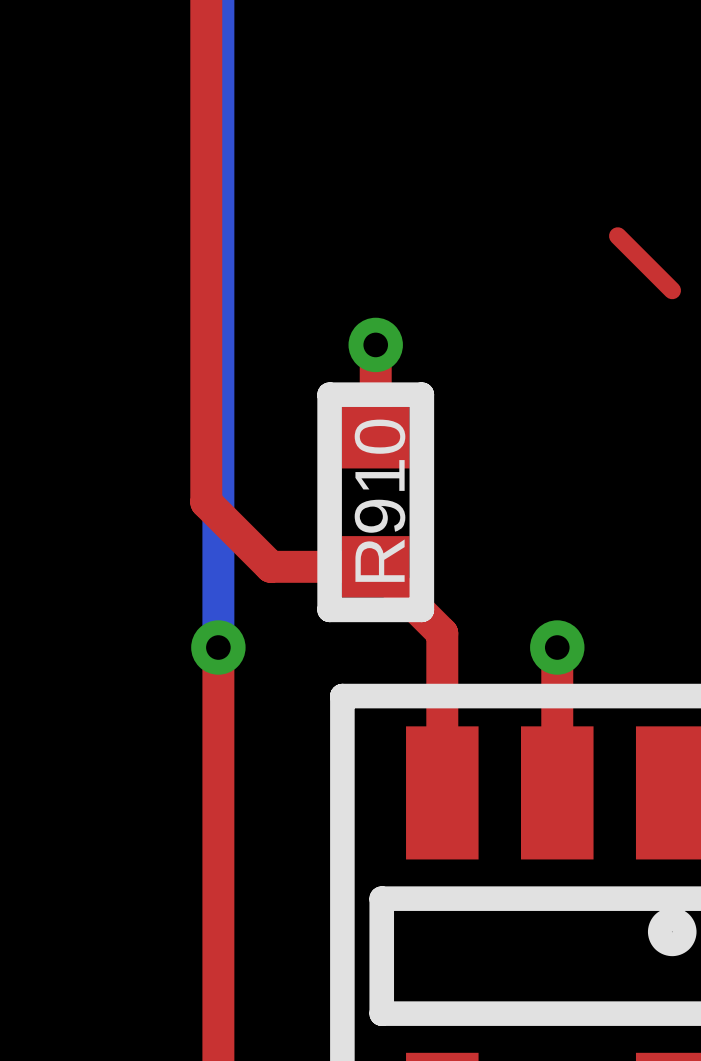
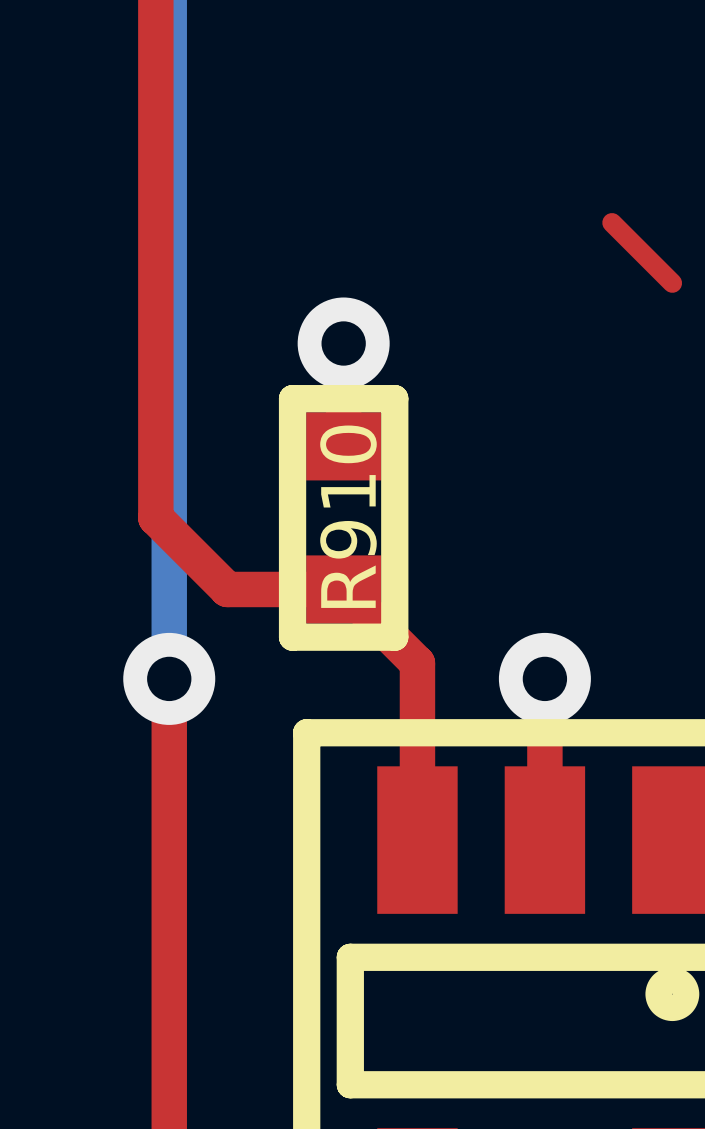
via size: [348, 317, 403, 373] -> [297, 297, 390, 390]
via size: [191, 620, 246, 675] -> [123, 632, 216, 725]
via size: [530, 620, 585, 675] -> [498, 632, 591, 725]

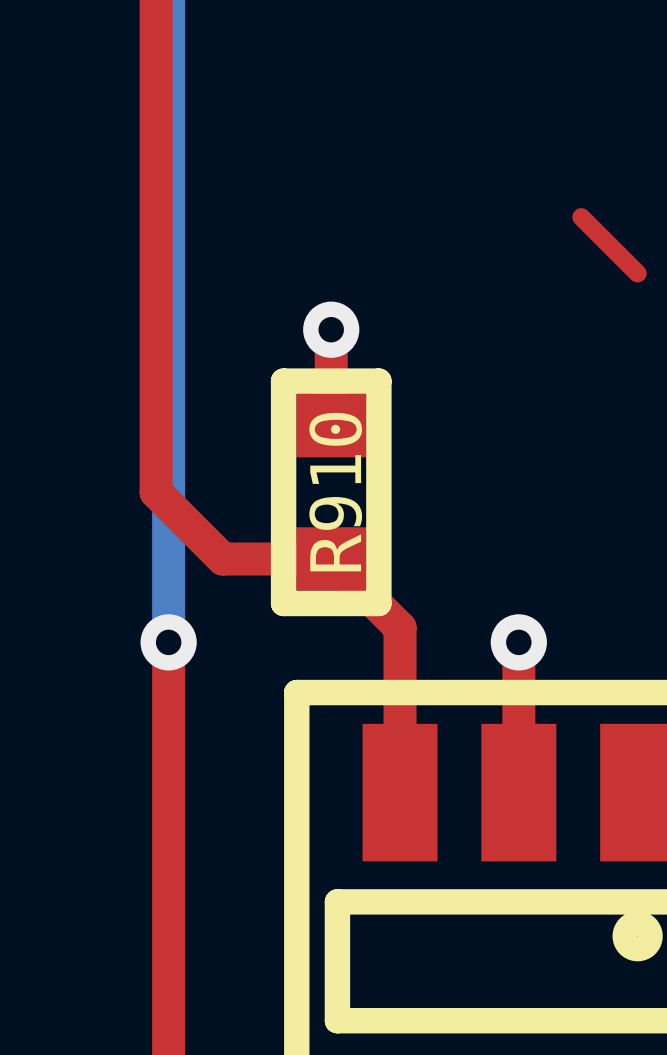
via size: [297, 297, 390, 390] -> [303, 301, 360, 358]
via size: [123, 632, 216, 725] -> [140, 614, 197, 671]
via size: [498, 632, 591, 725] -> [490, 614, 547, 671]

